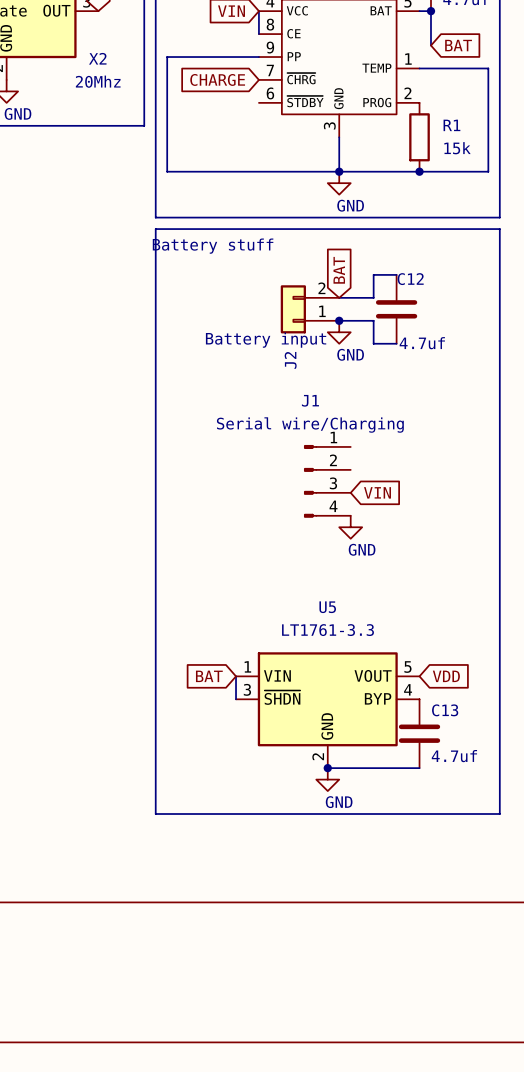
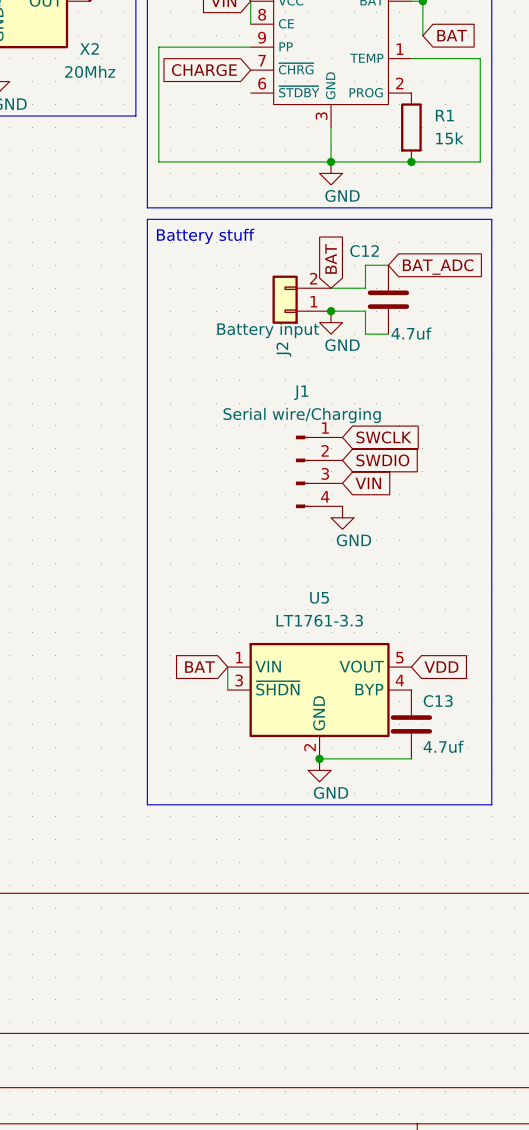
global label: none -> BAT_ADC (438, 267)
C12 name position: C12 (410, 279) -> C12 (364, 251)
global label: none -> SWCLK (383, 437)
global label: none -> SWDIO (382, 460)

